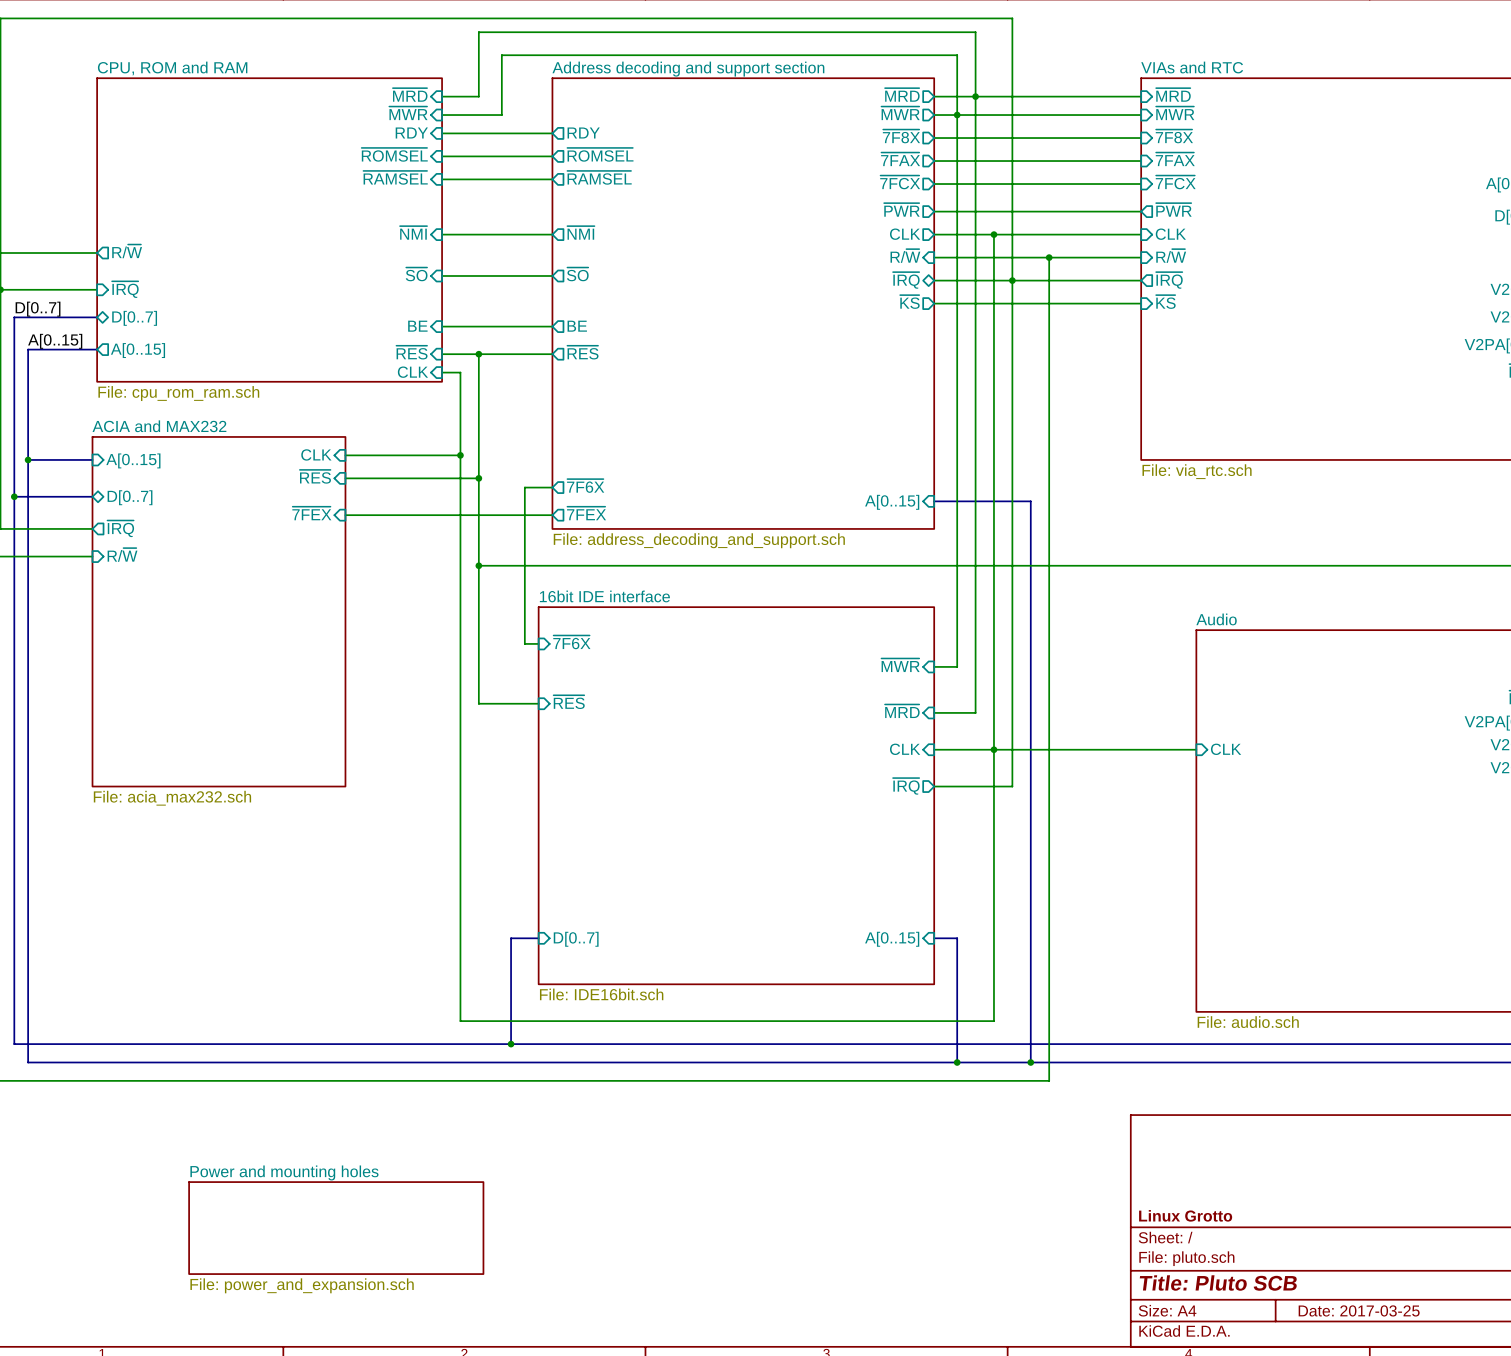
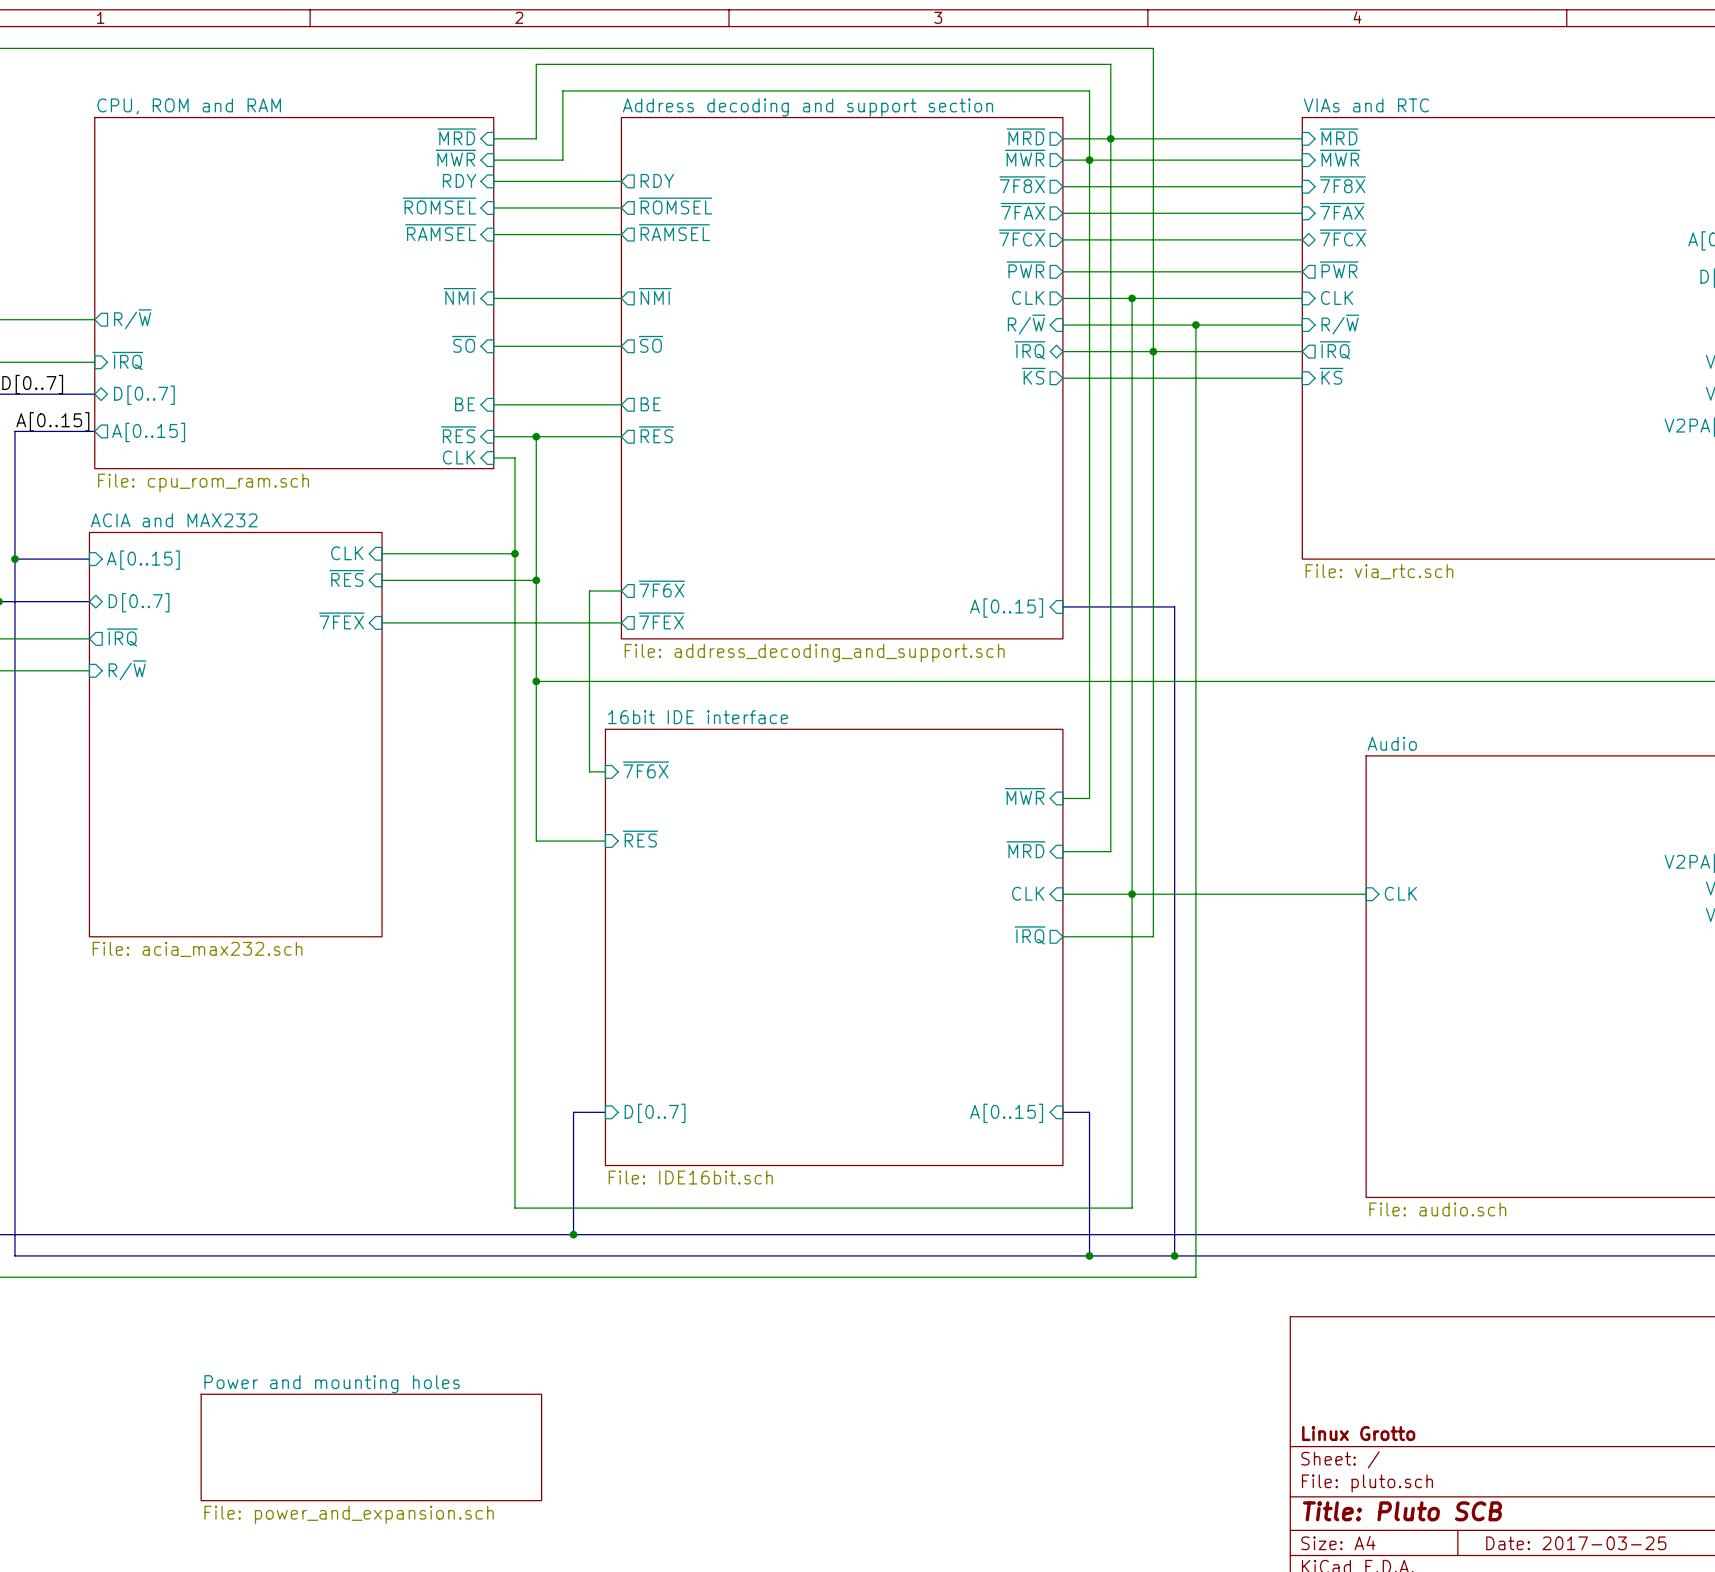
sheet pin shape: input (1175, 182) -> bidirectional (1343, 237)

